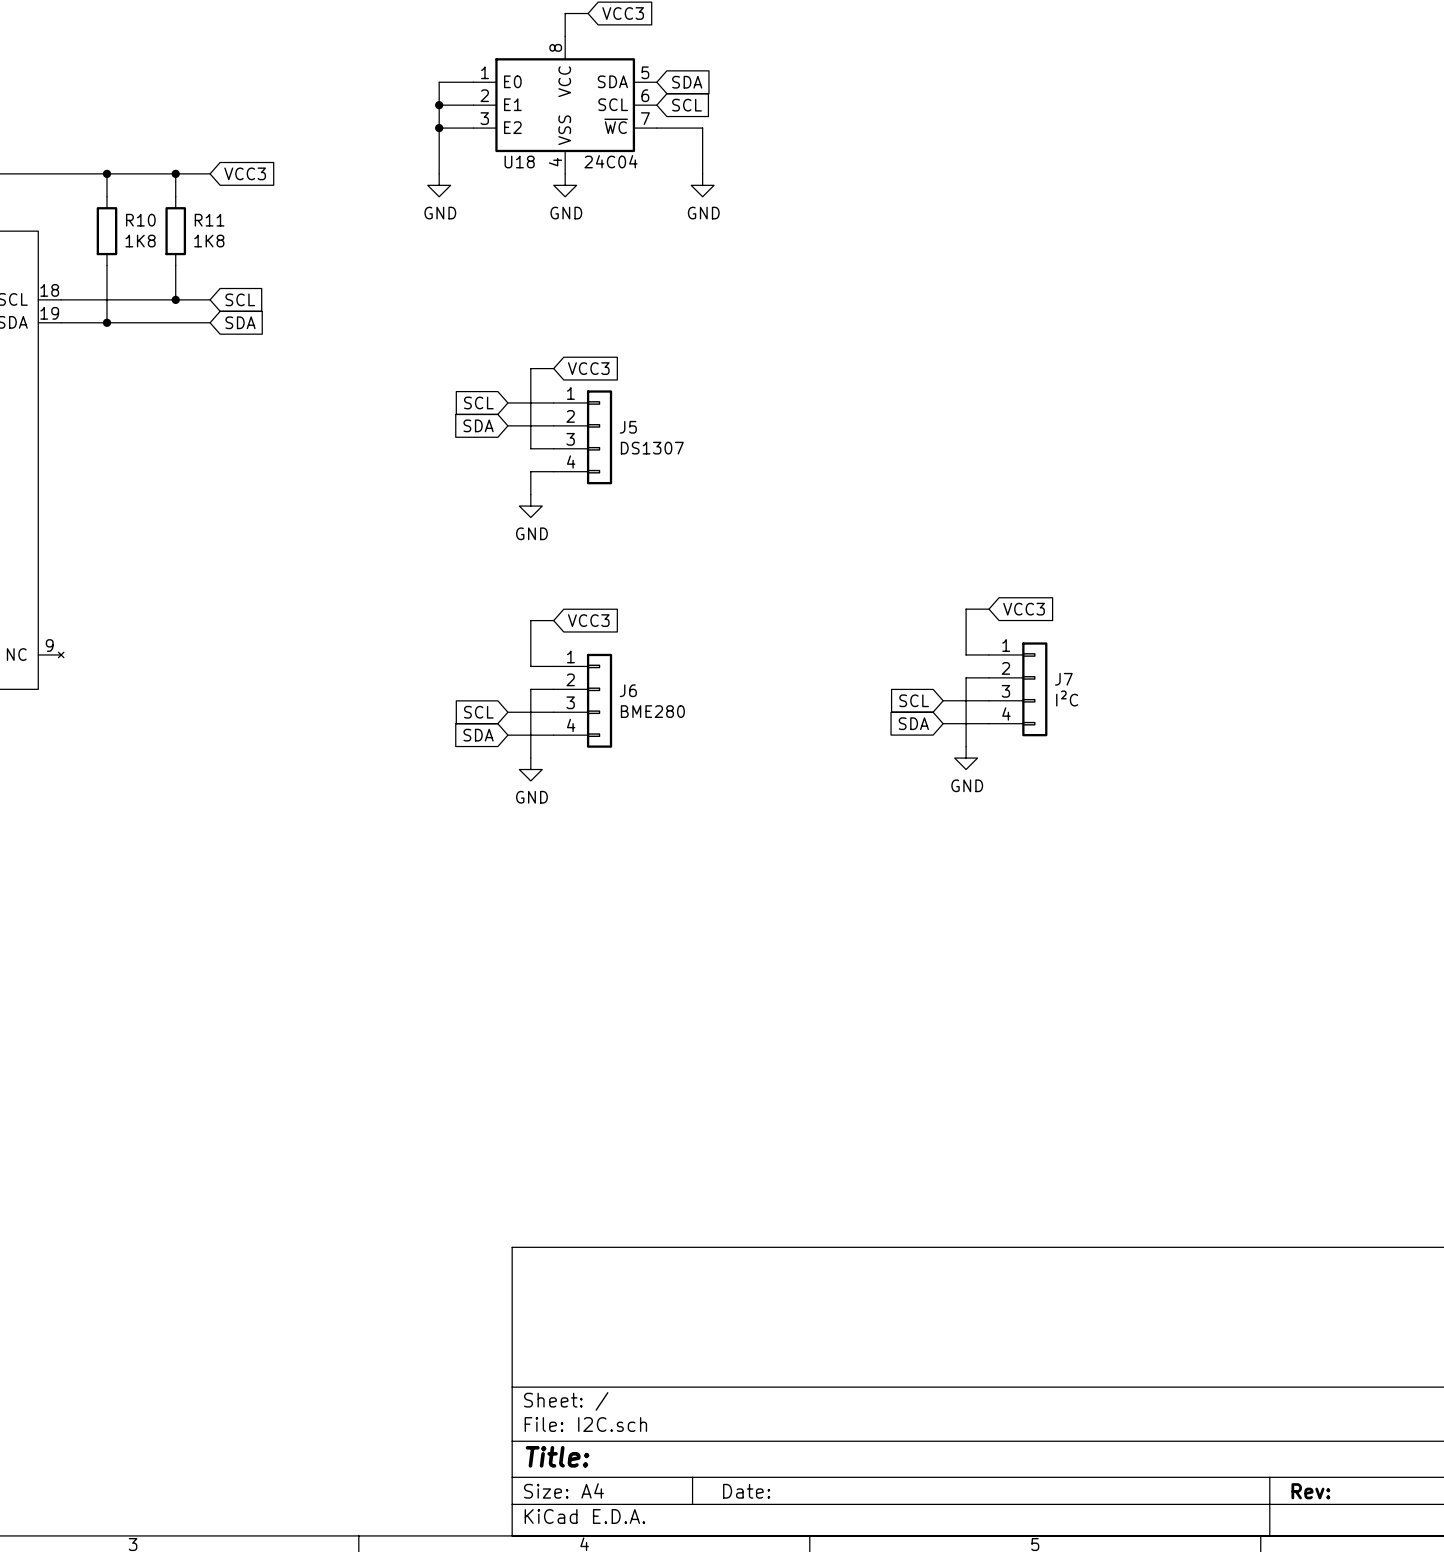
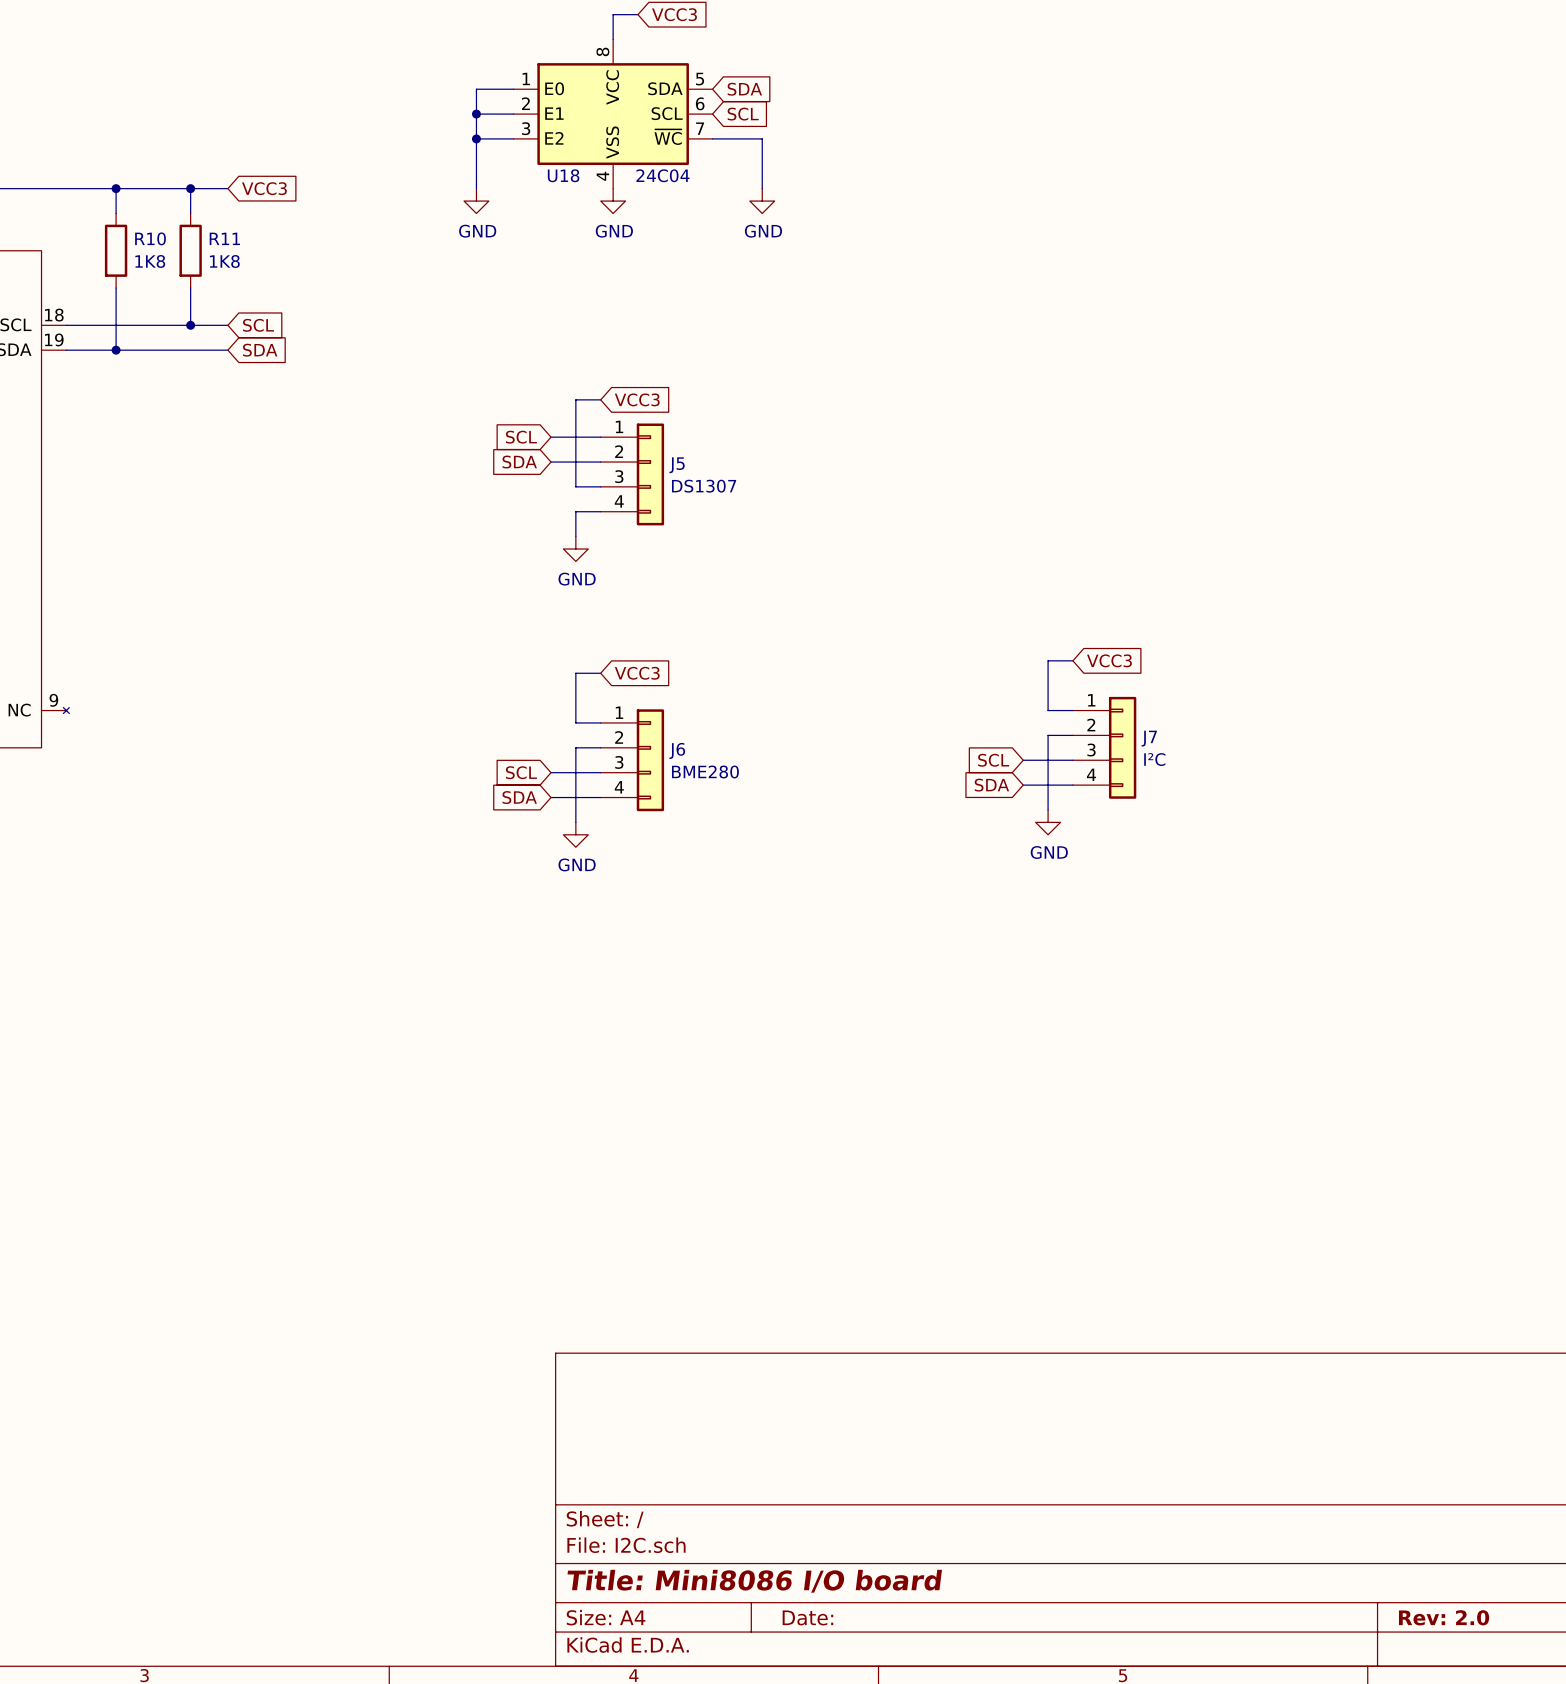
title block: Title: (557, 1456) -> Title: Mini8086 I/O board (754, 1581)
title block: Rev: (1310, 1491) -> Rev: 2.0 (1444, 1617)

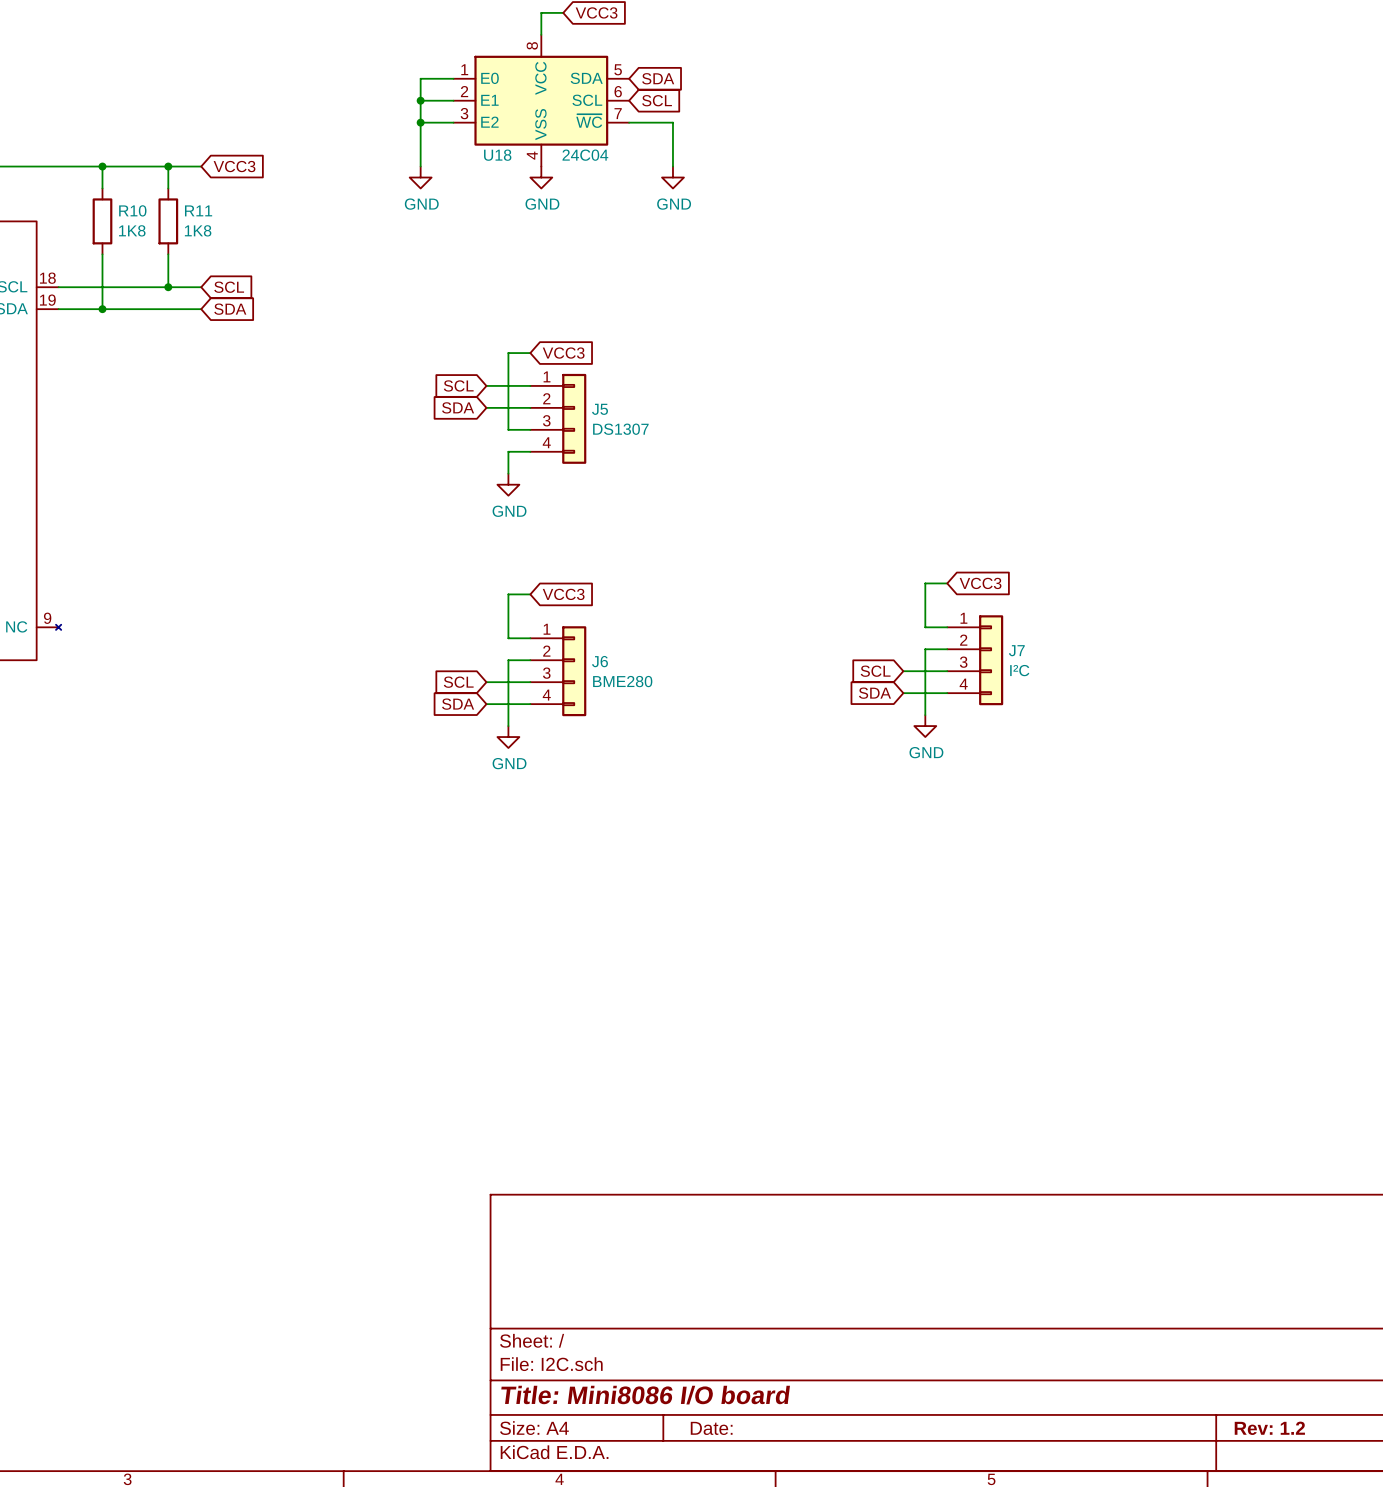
title block: Rev: 2.0 (1444, 1617) -> Rev: 1.2 (1269, 1428)

